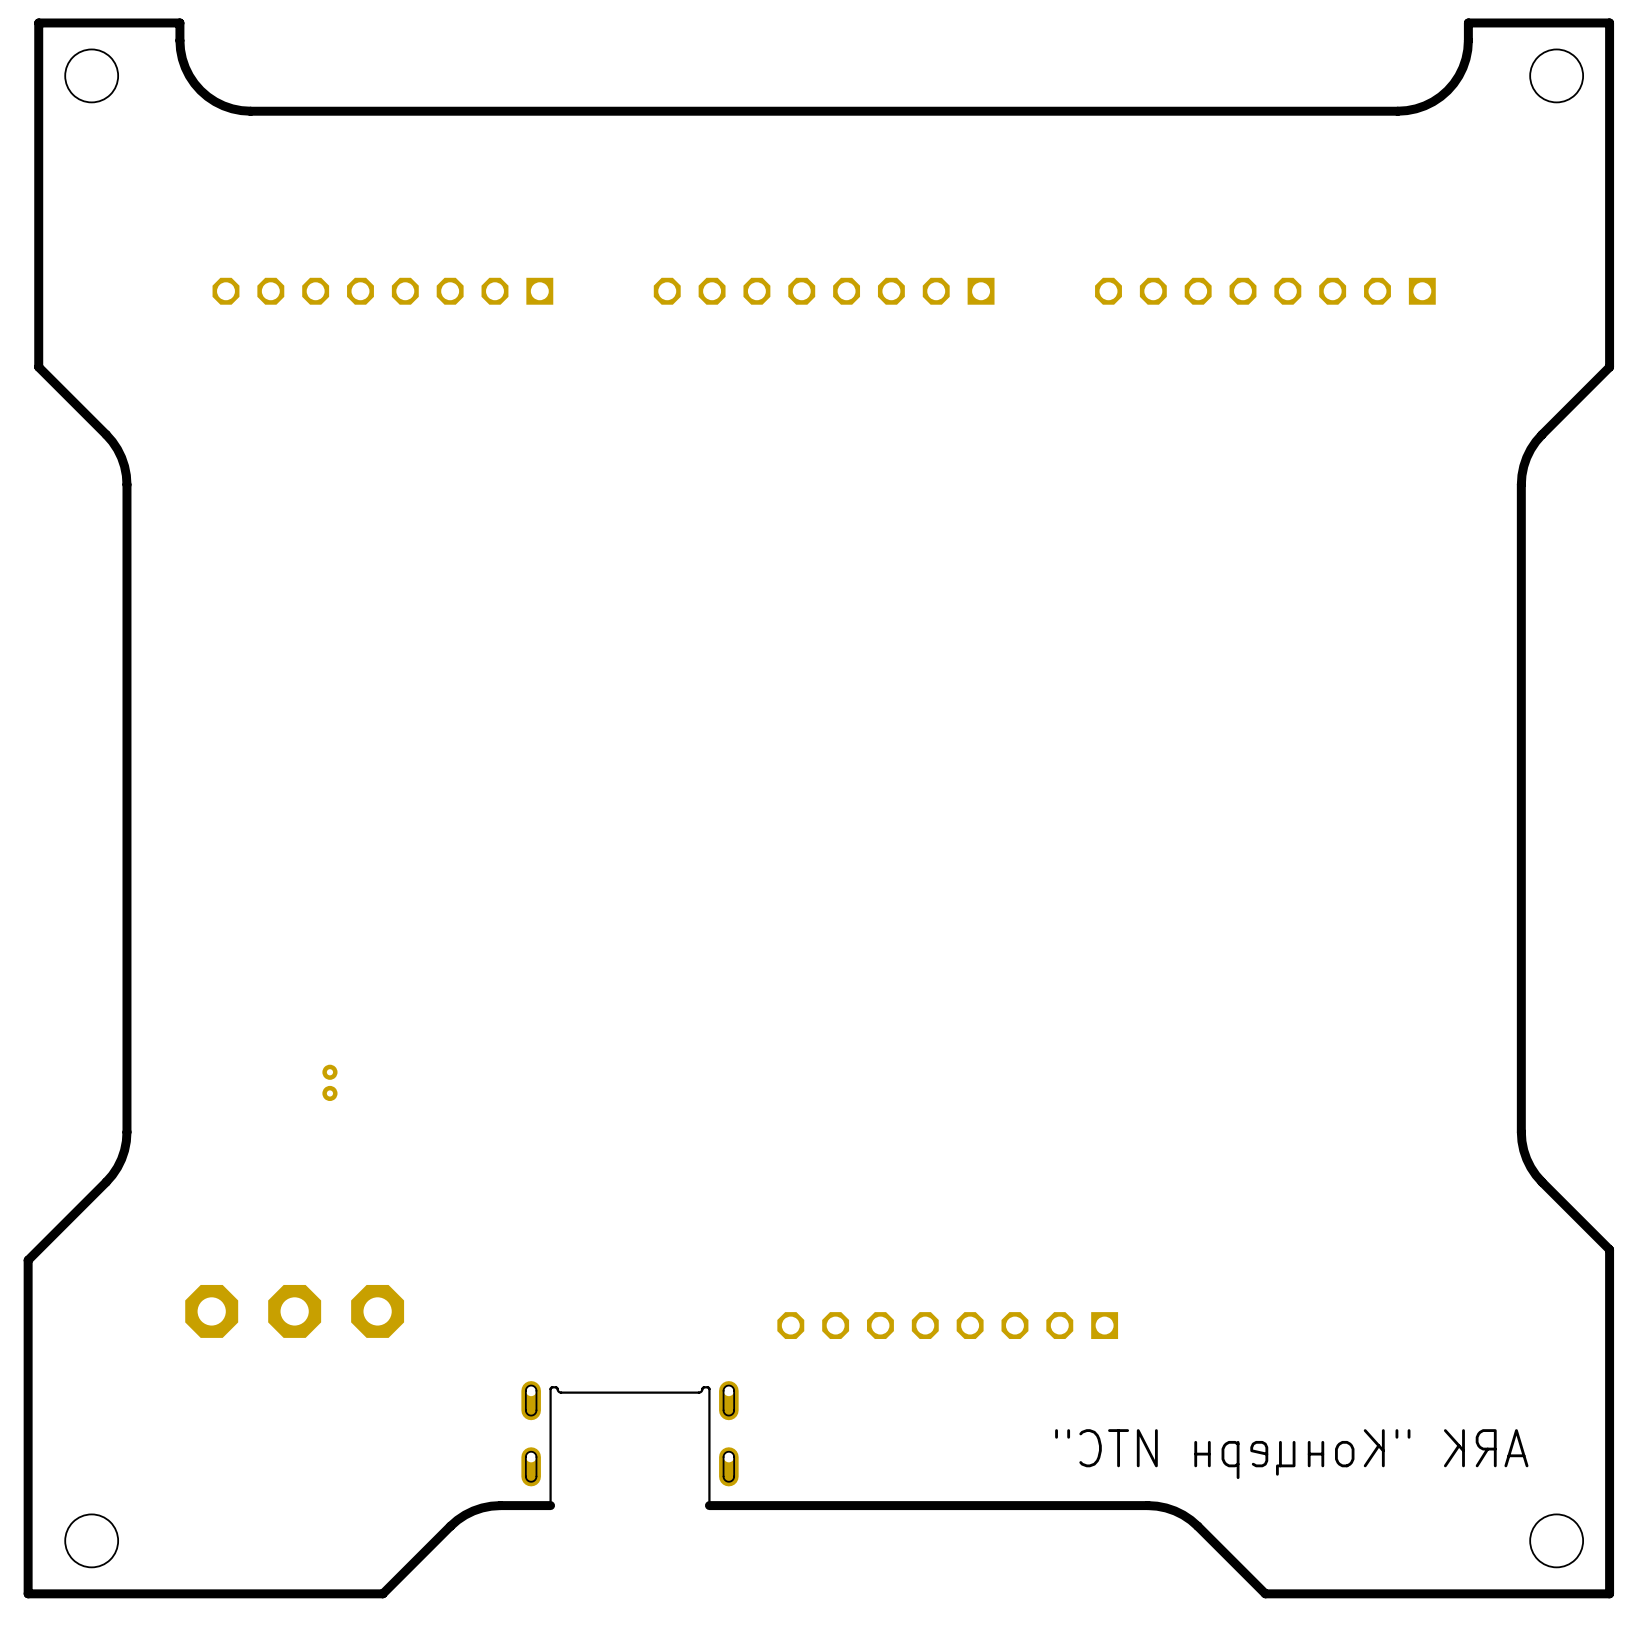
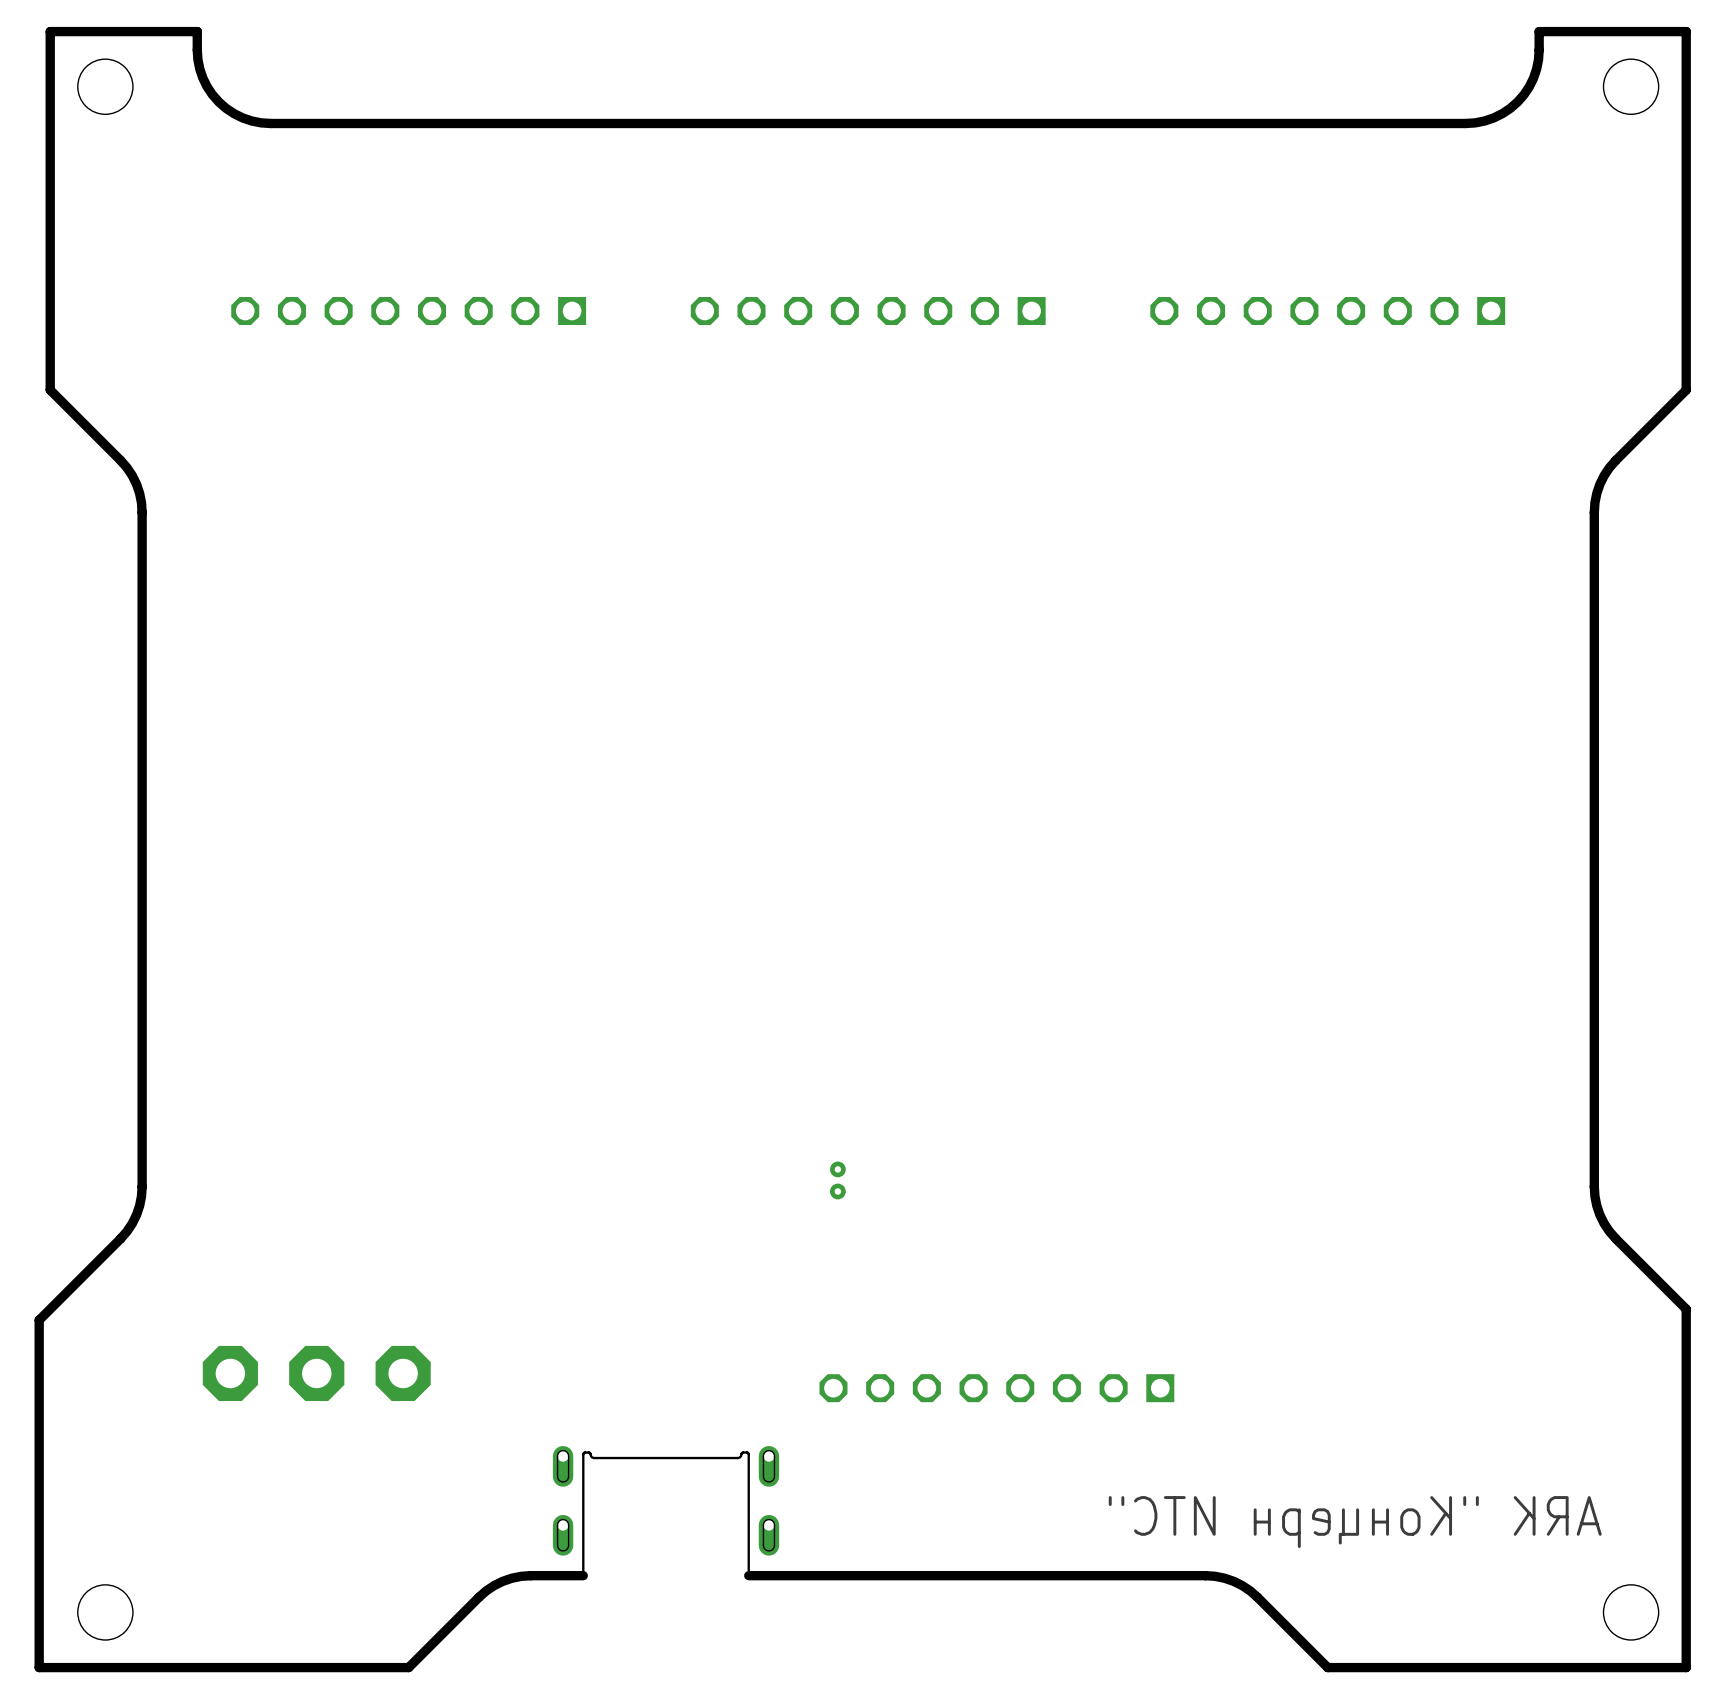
part: (329, 1082) -> none
part: none -> (837, 1180)

